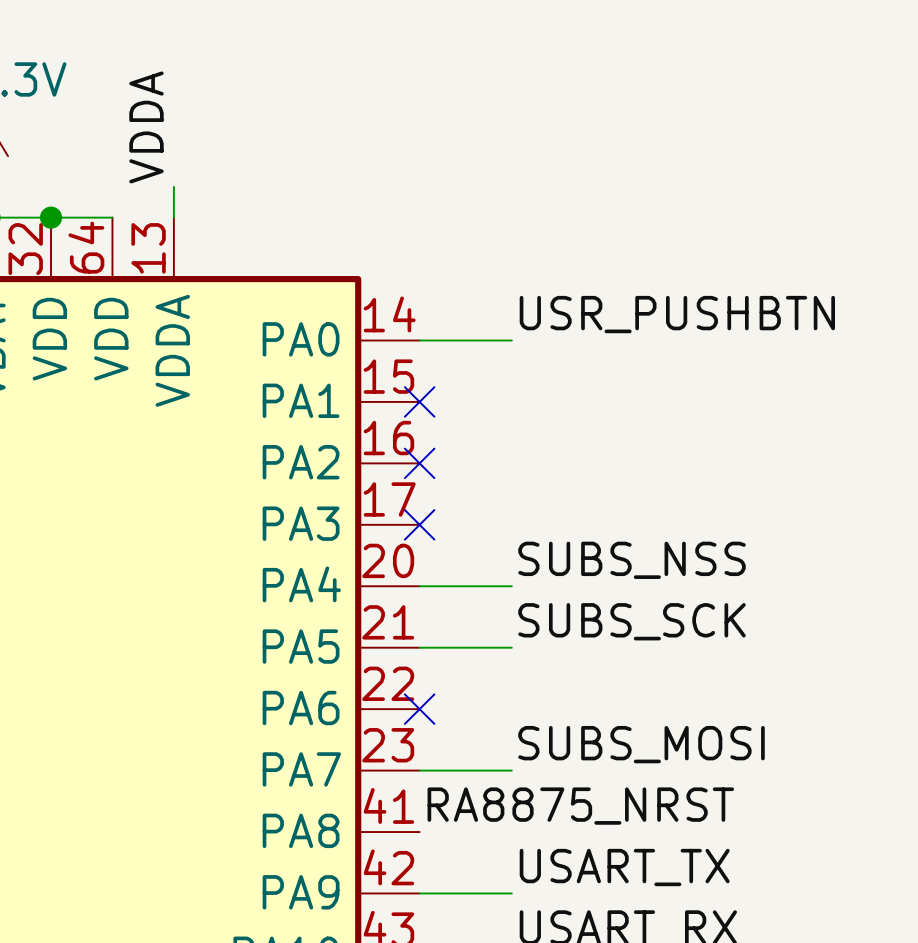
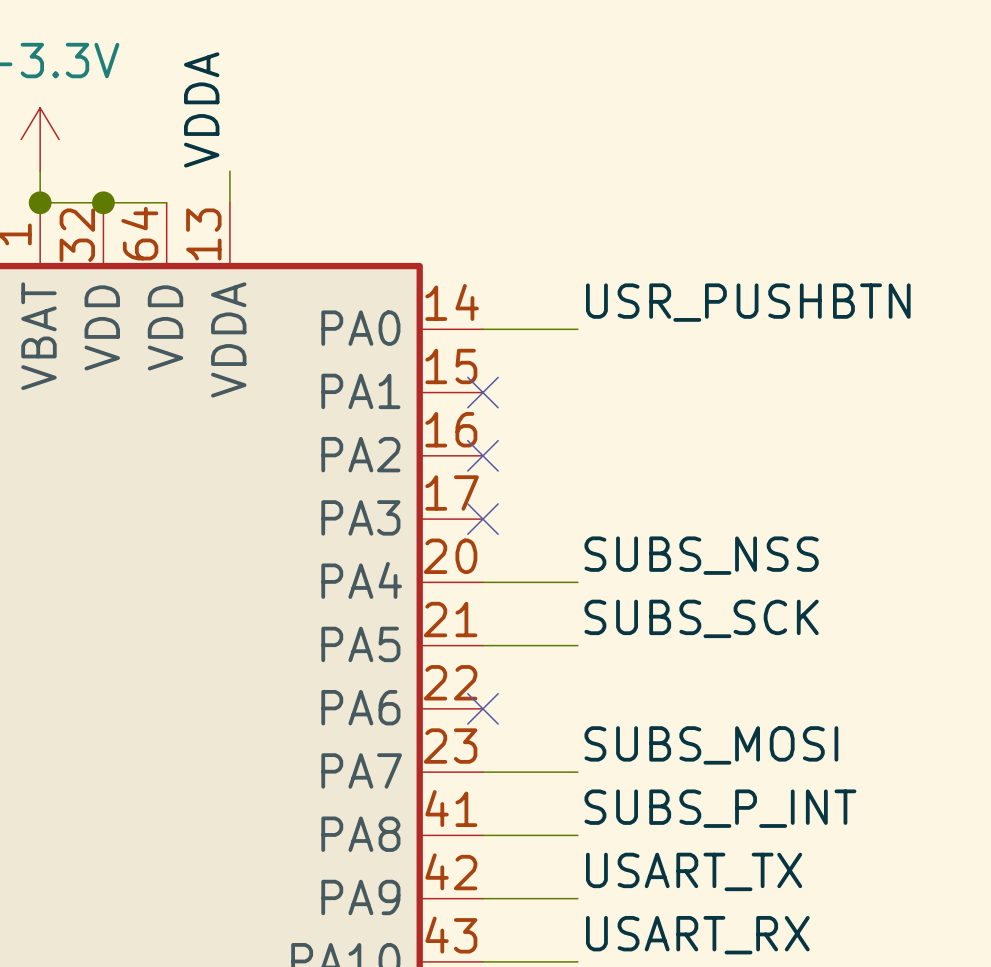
label: RA8875_NRST (580, 806) -> none
label: none -> SUBS_P_INT (720, 808)
wire: none -> (482, 835) (577, 835)

